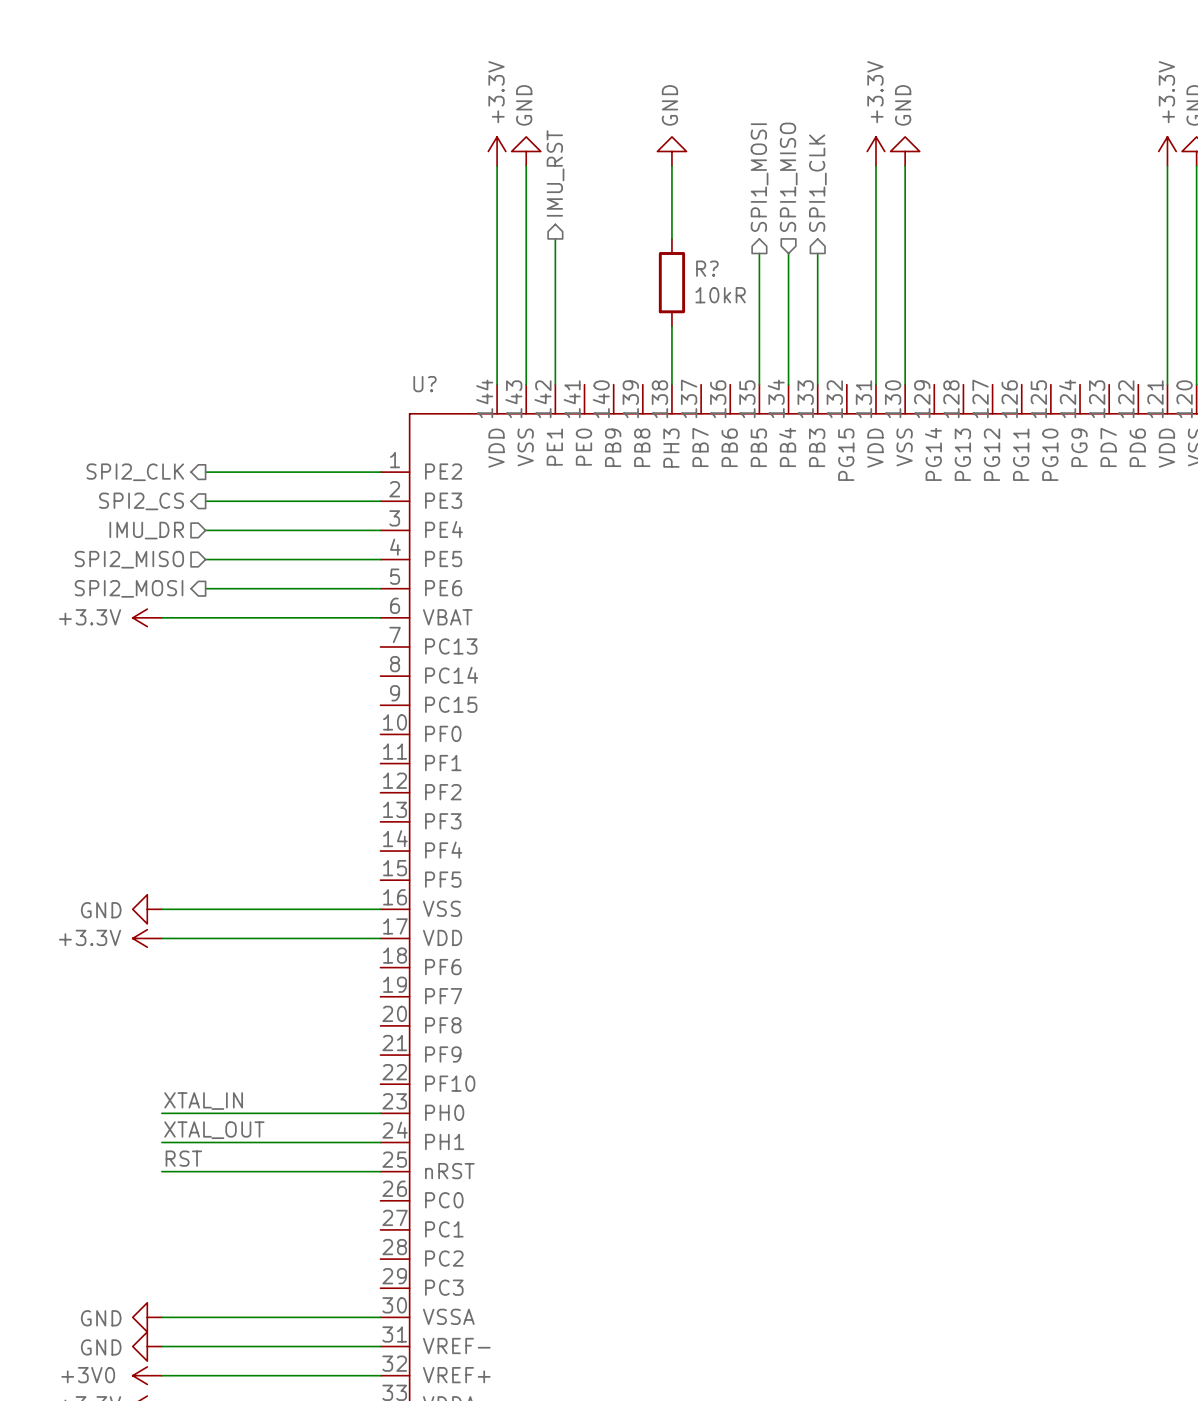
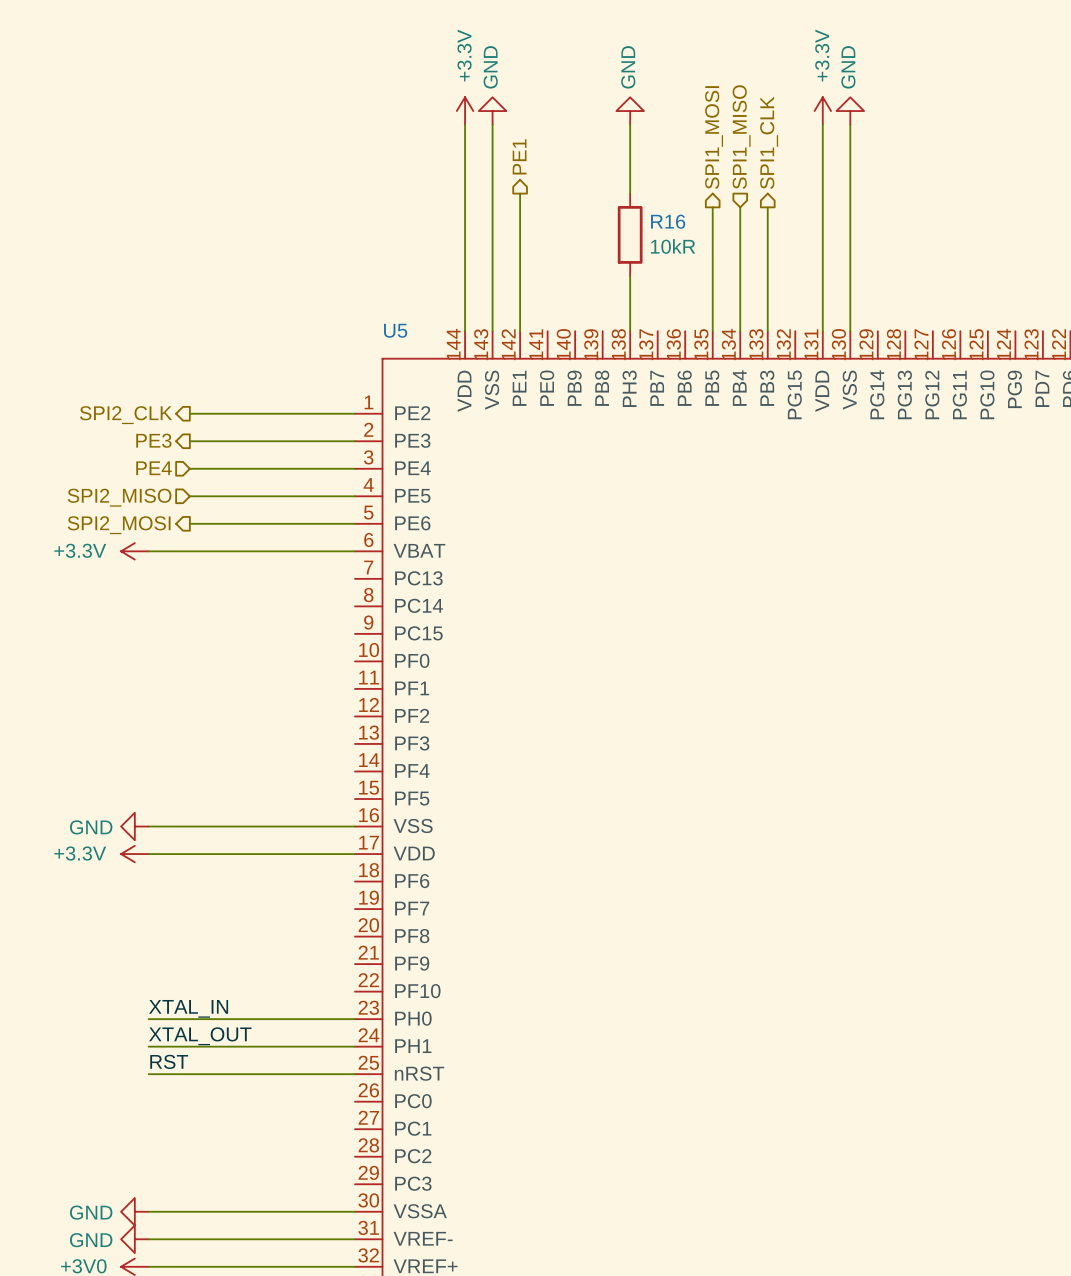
hierarchical label: IMU_RST (555, 173) -> PE1 (519, 156)
R? name: R? (707, 268) -> R16 (668, 221)
U? name: U? (425, 384) -> U5 (395, 330)
hierarchical label: SPI2_CS (141, 501) -> PE3 (153, 440)
hierarchical label: IMU_DR (146, 530) -> PE4 (154, 468)

